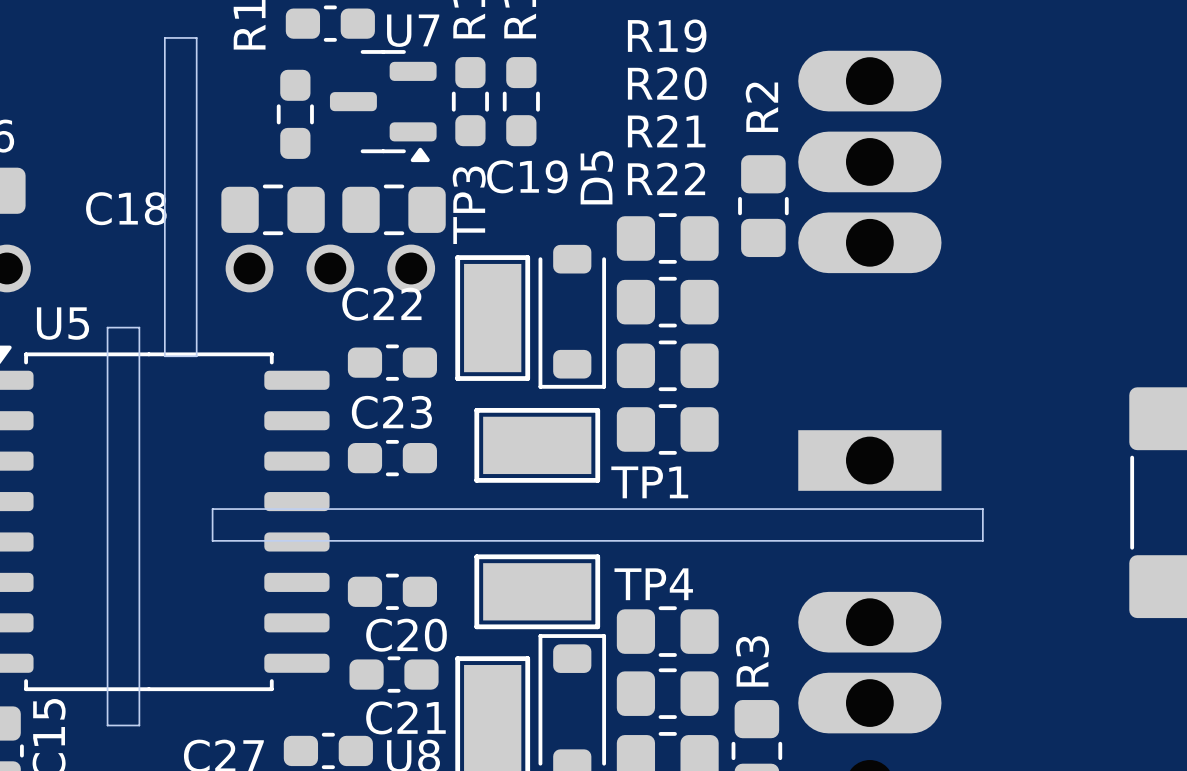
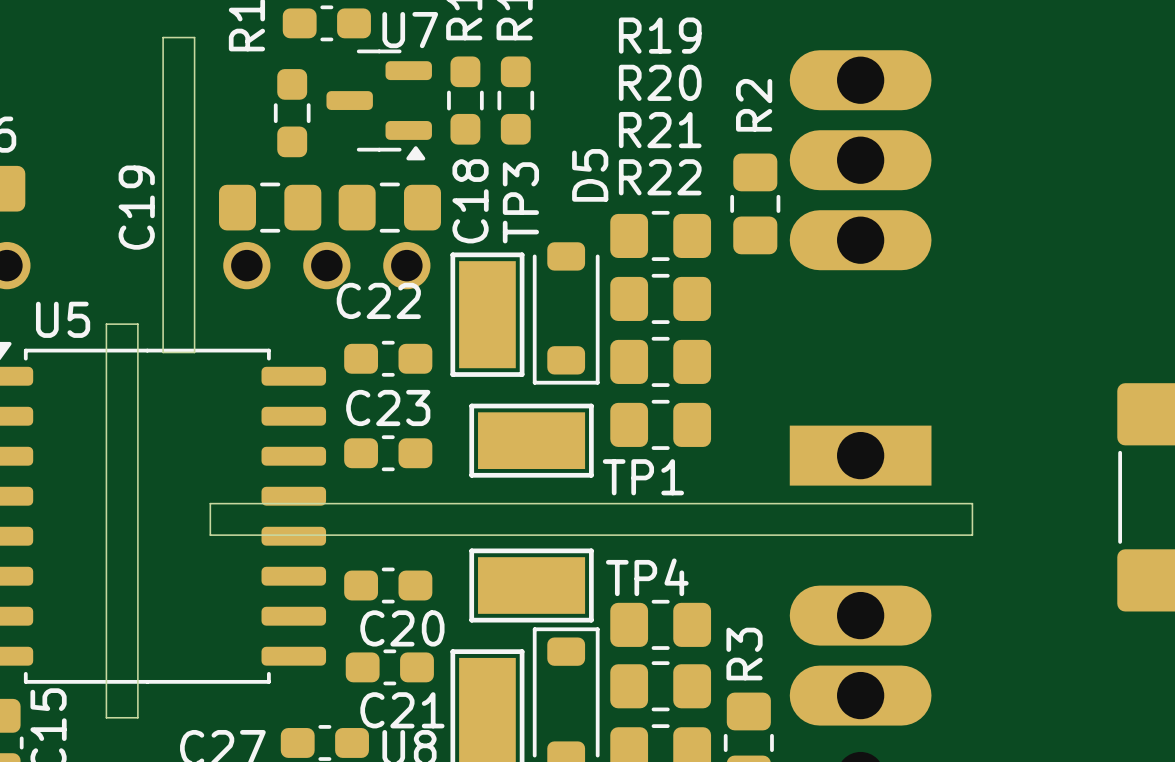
C19 name rotation: 0° (527, 176) -> 90° counterclockwise (136, 207)
C19 name position: C19 (527, 176) -> C19 (136, 207)
TP3 name position: TP3 (469, 205) -> TP3 (520, 202)
C18 name rotation: 0° (126, 208) -> 90° counterclockwise (470, 201)
C18 name position: C18 (126, 208) -> C18 (470, 201)

